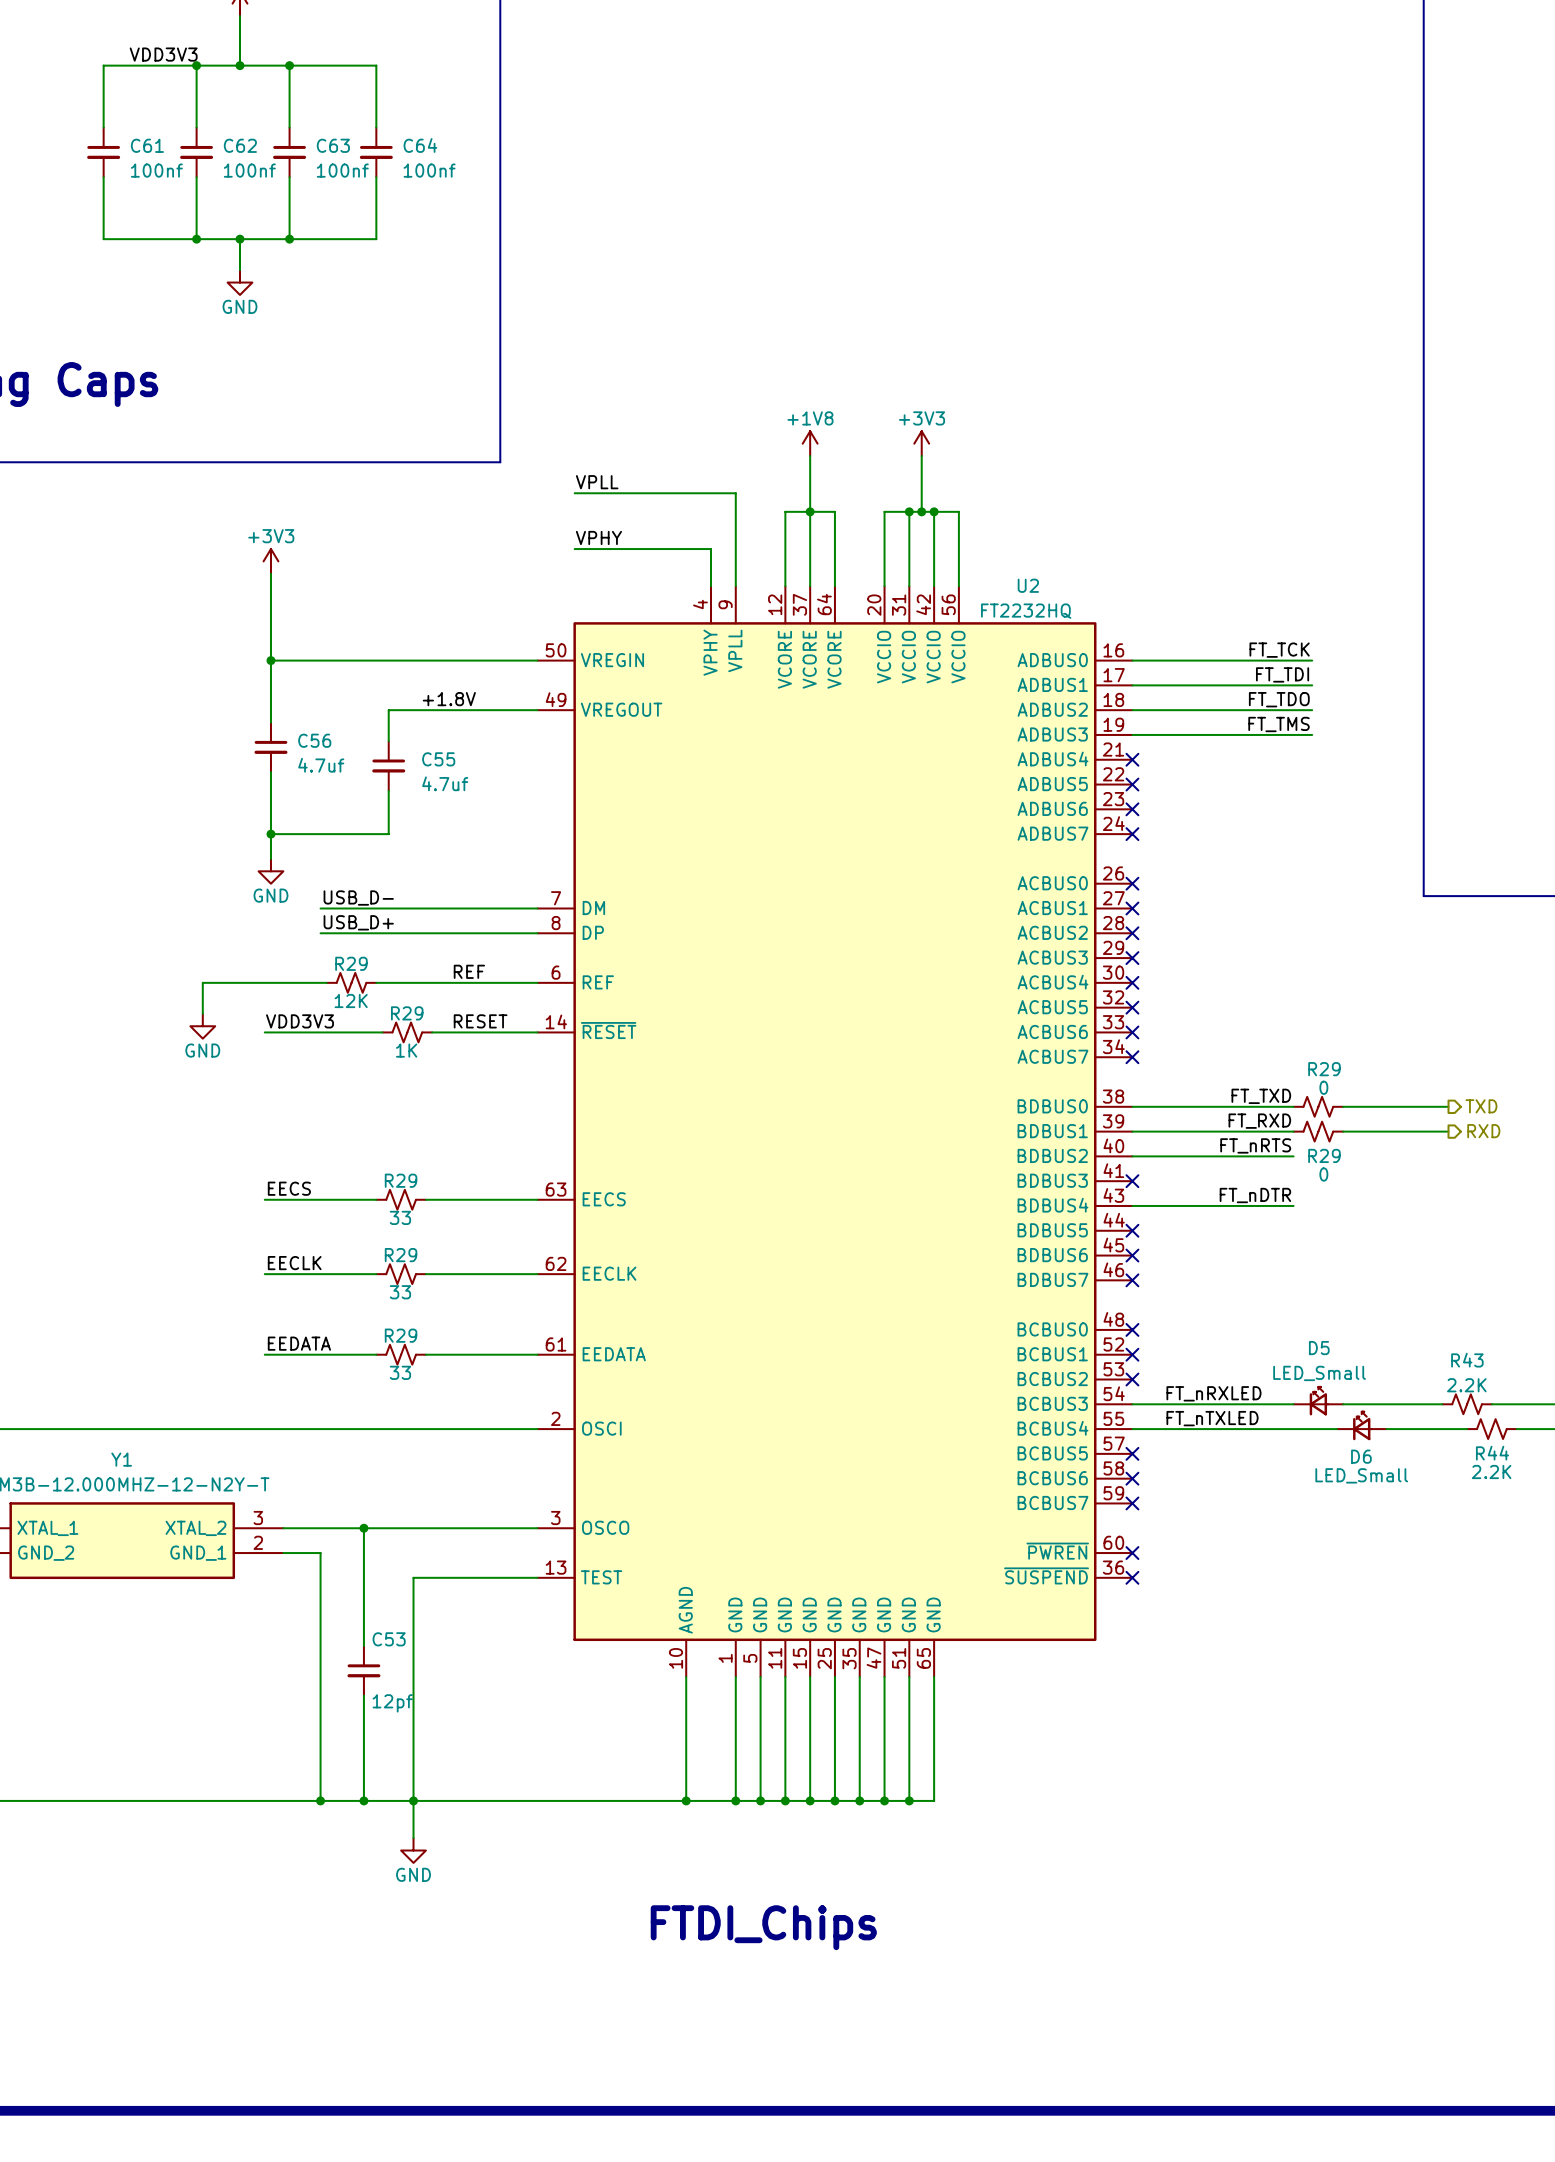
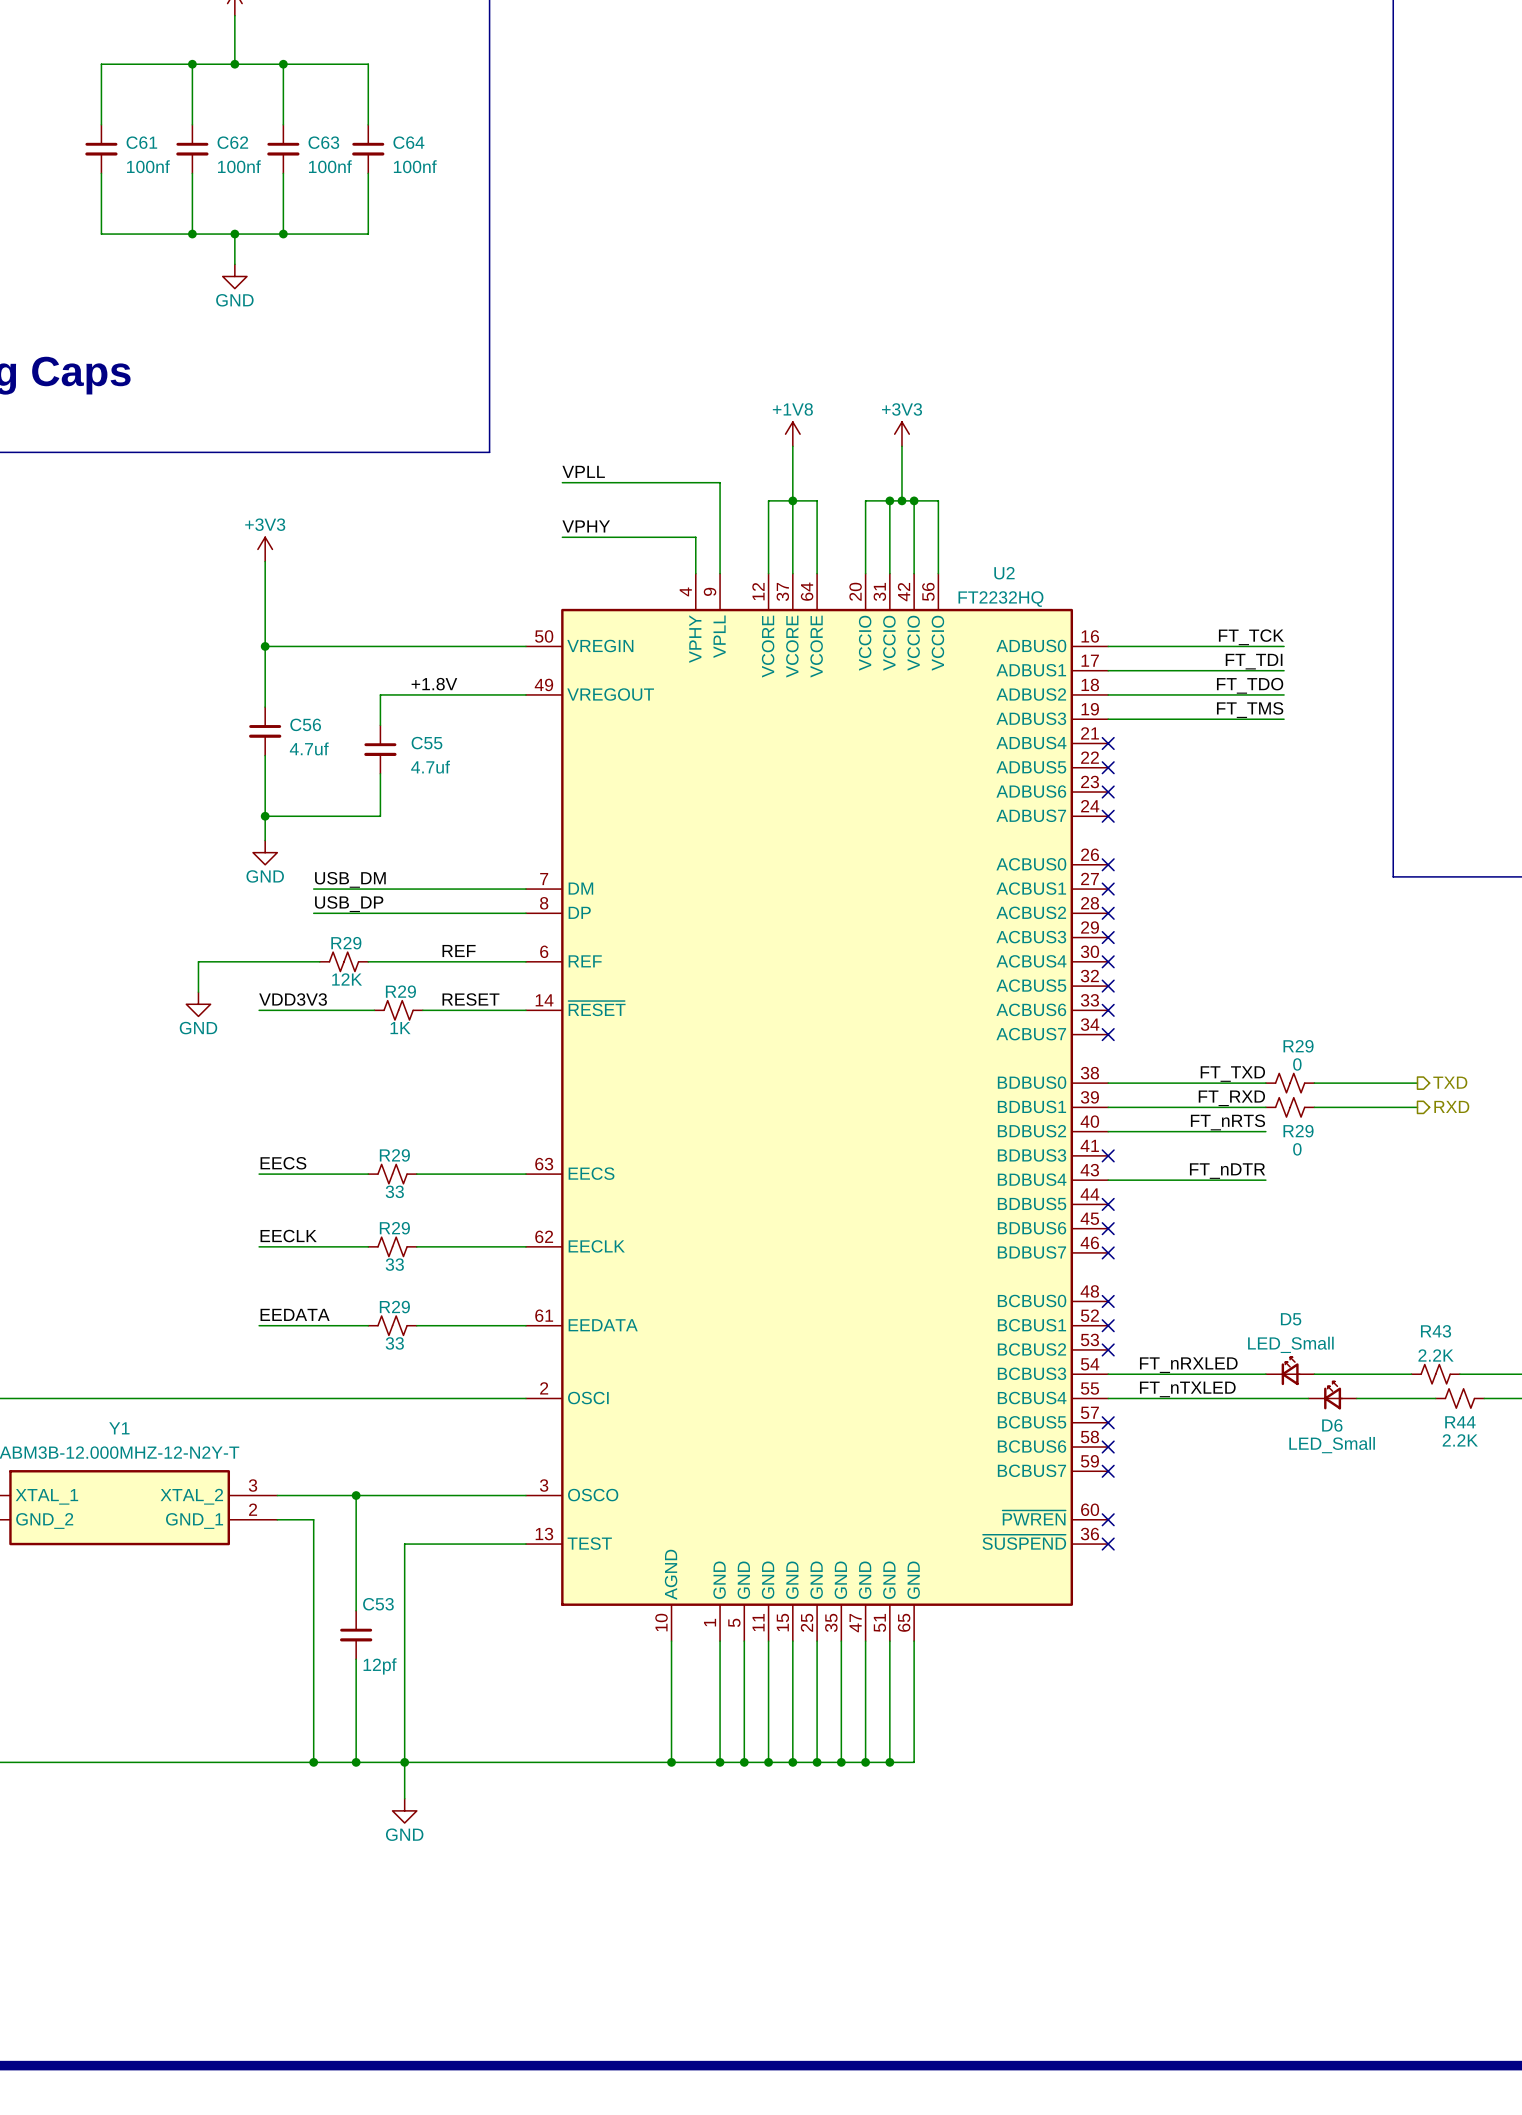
label: VDD3V3 (163, 54) -> none
label: USB_D- (358, 898) -> USB_DM (350, 879)
label: USB_D+ (358, 922) -> USB_DP (349, 904)
text: FTDI_Chips (763, 1927) -> none

